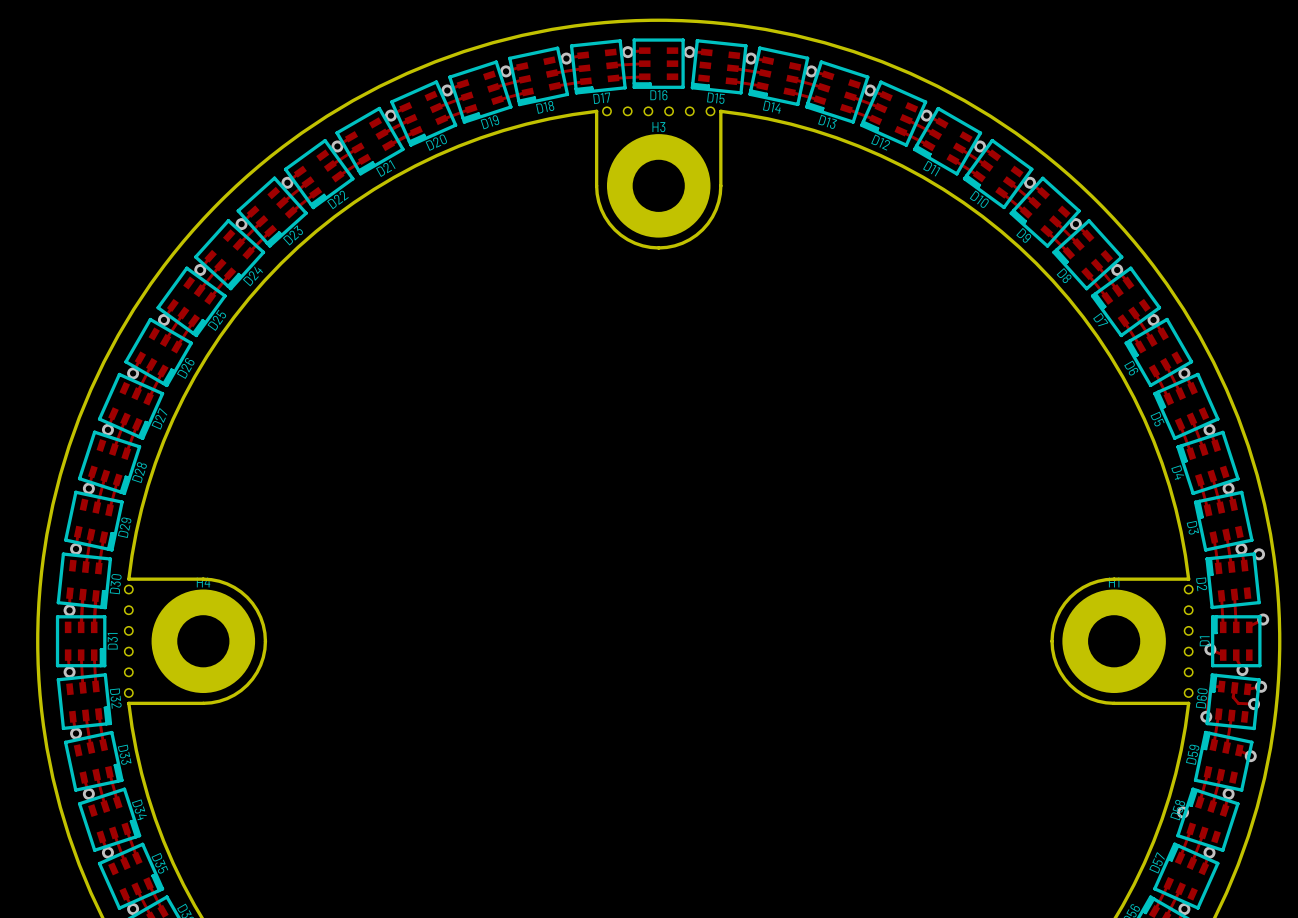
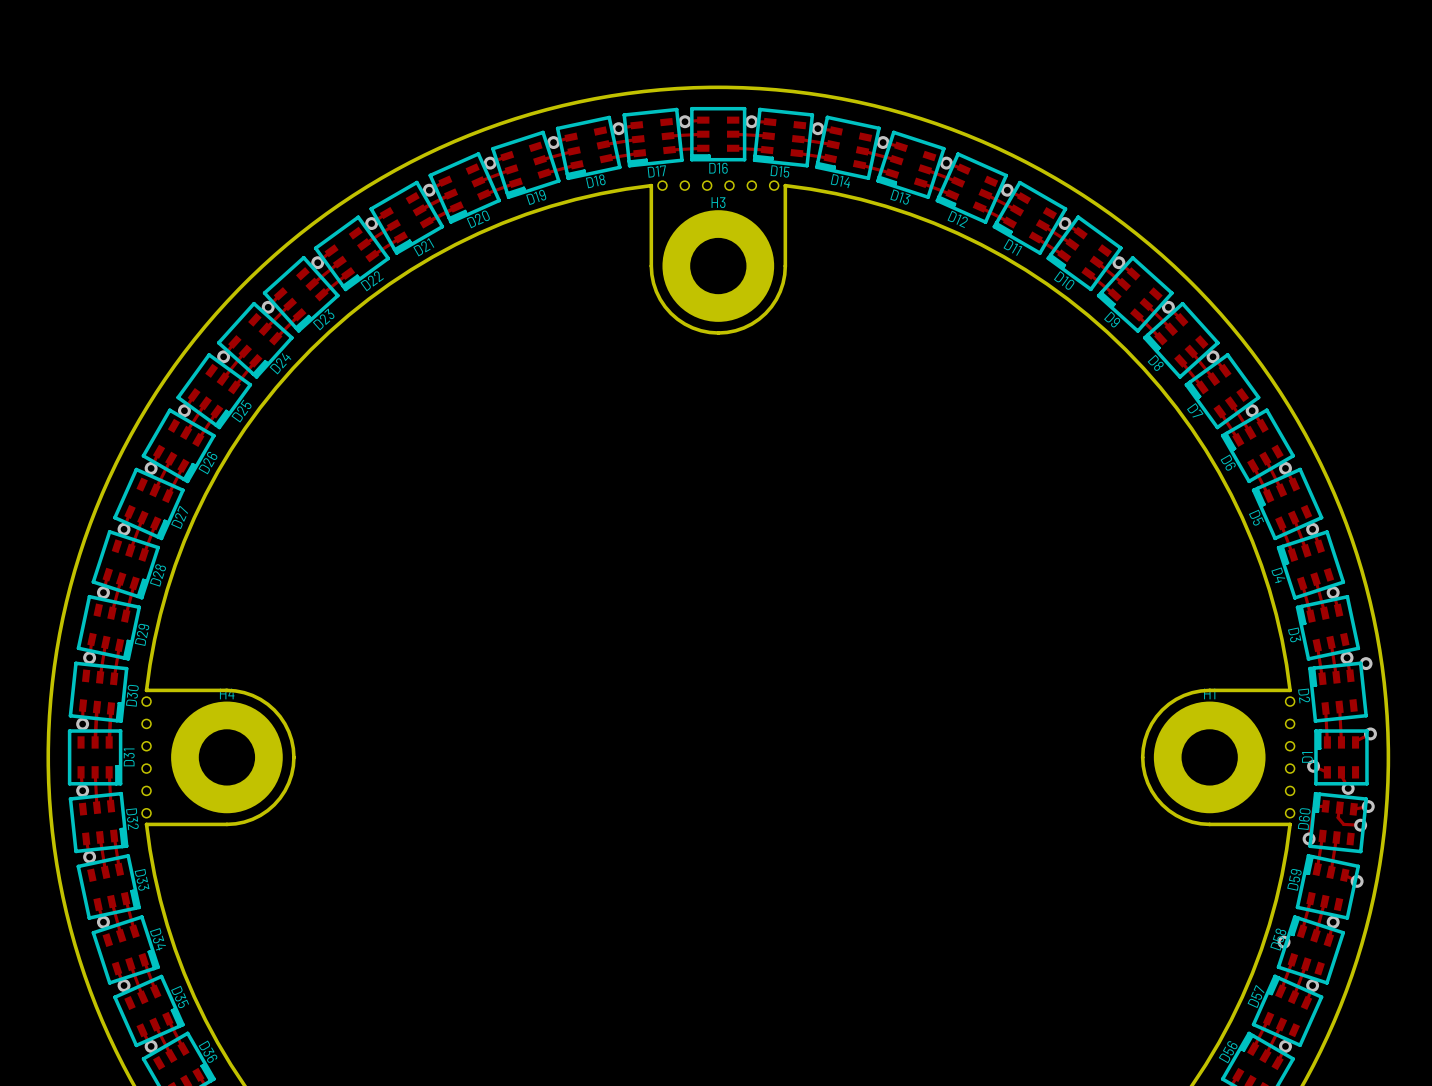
track: none -> (733, 134) (768, 136)
track: none -> (733, 148) (767, 150)

